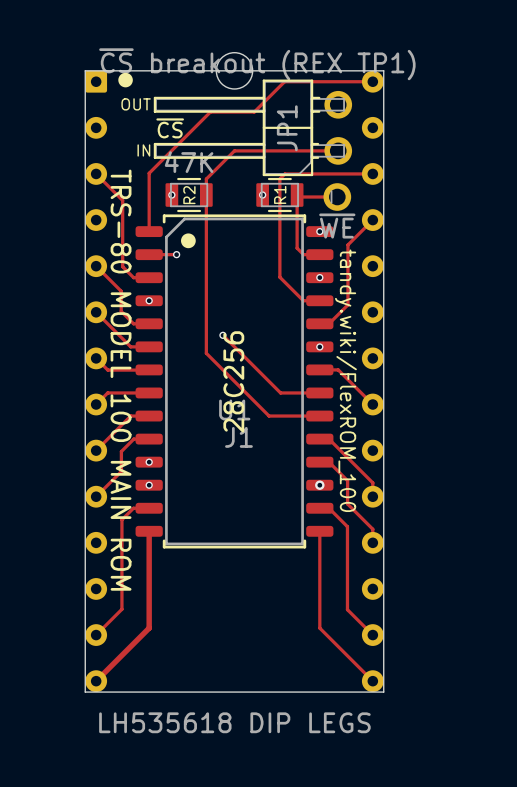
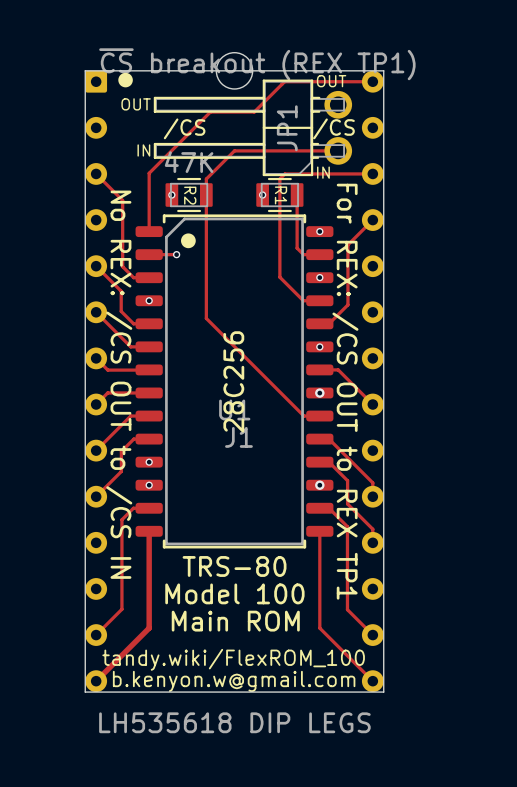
text: none -> OUT (331, 81)
text: ~{CS} (170, 128) -> /CS (184, 128)
text: none -> /CS (334, 128)
text: none -> IN (323, 172)
R1 name rotation: 0° (280, 194) -> 180° (281, 195)
R2 name rotation: 0° (189, 195) -> 180° (190, 195)
track: (297, 195) (299, 197) (337, 197) -> none
part: ~{WE} (337, 197) -> none
track: (206, 318) (206, 353) (269, 416) (303, 416) -> (206, 318) (303, 416)
track: (222, 335) (280, 392) (319, 392) -> none
via: (222, 335) -> none
text: TRS-80 MODEL 100 MAIN ROM (121, 380) -> No REX: /CS OUT to /CS IN (119, 384)
text rotation: 0° (345, 380) -> 90° counterclockwise (233, 659)
text: none -> For REX: /CS OUT to REX TP1 (345, 391)
via: none -> (319, 393)
text: none -> TRS-80 (234, 566)
text: none -> Model 100 (234, 593)
text: none -> Main ROM (235, 621)
text: none -> b.kenyon.w@gmail.com (234, 681)

